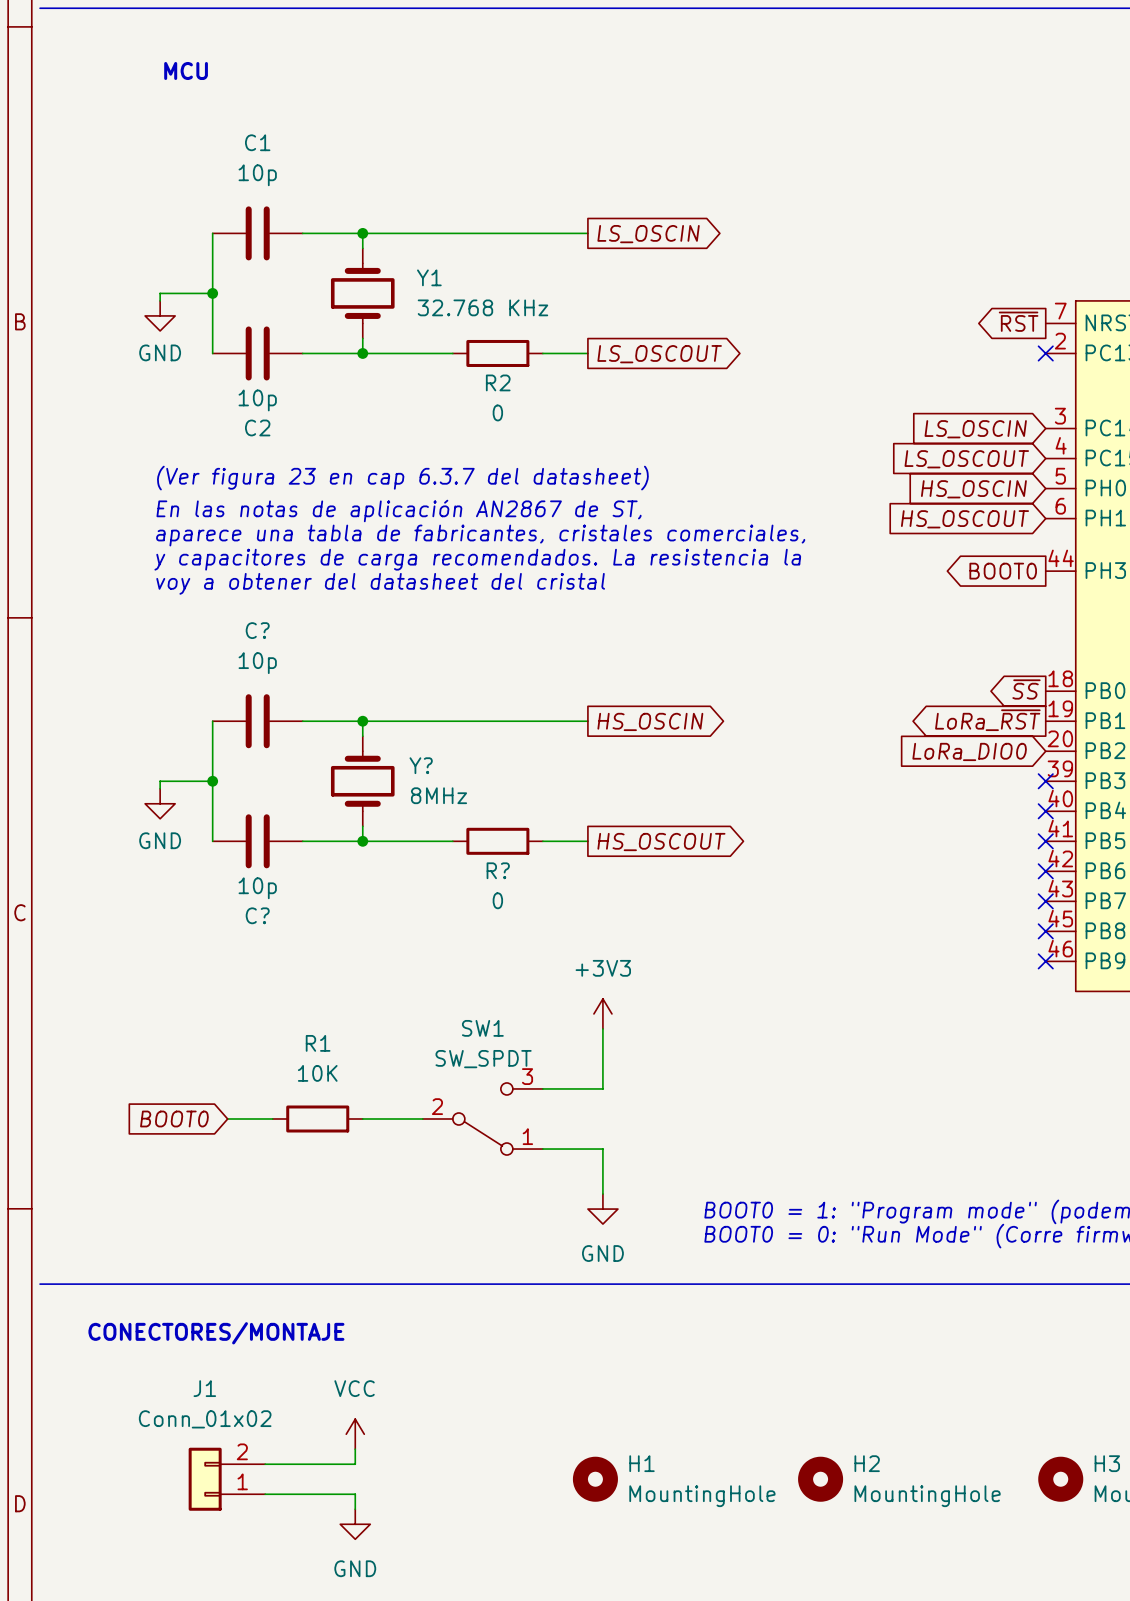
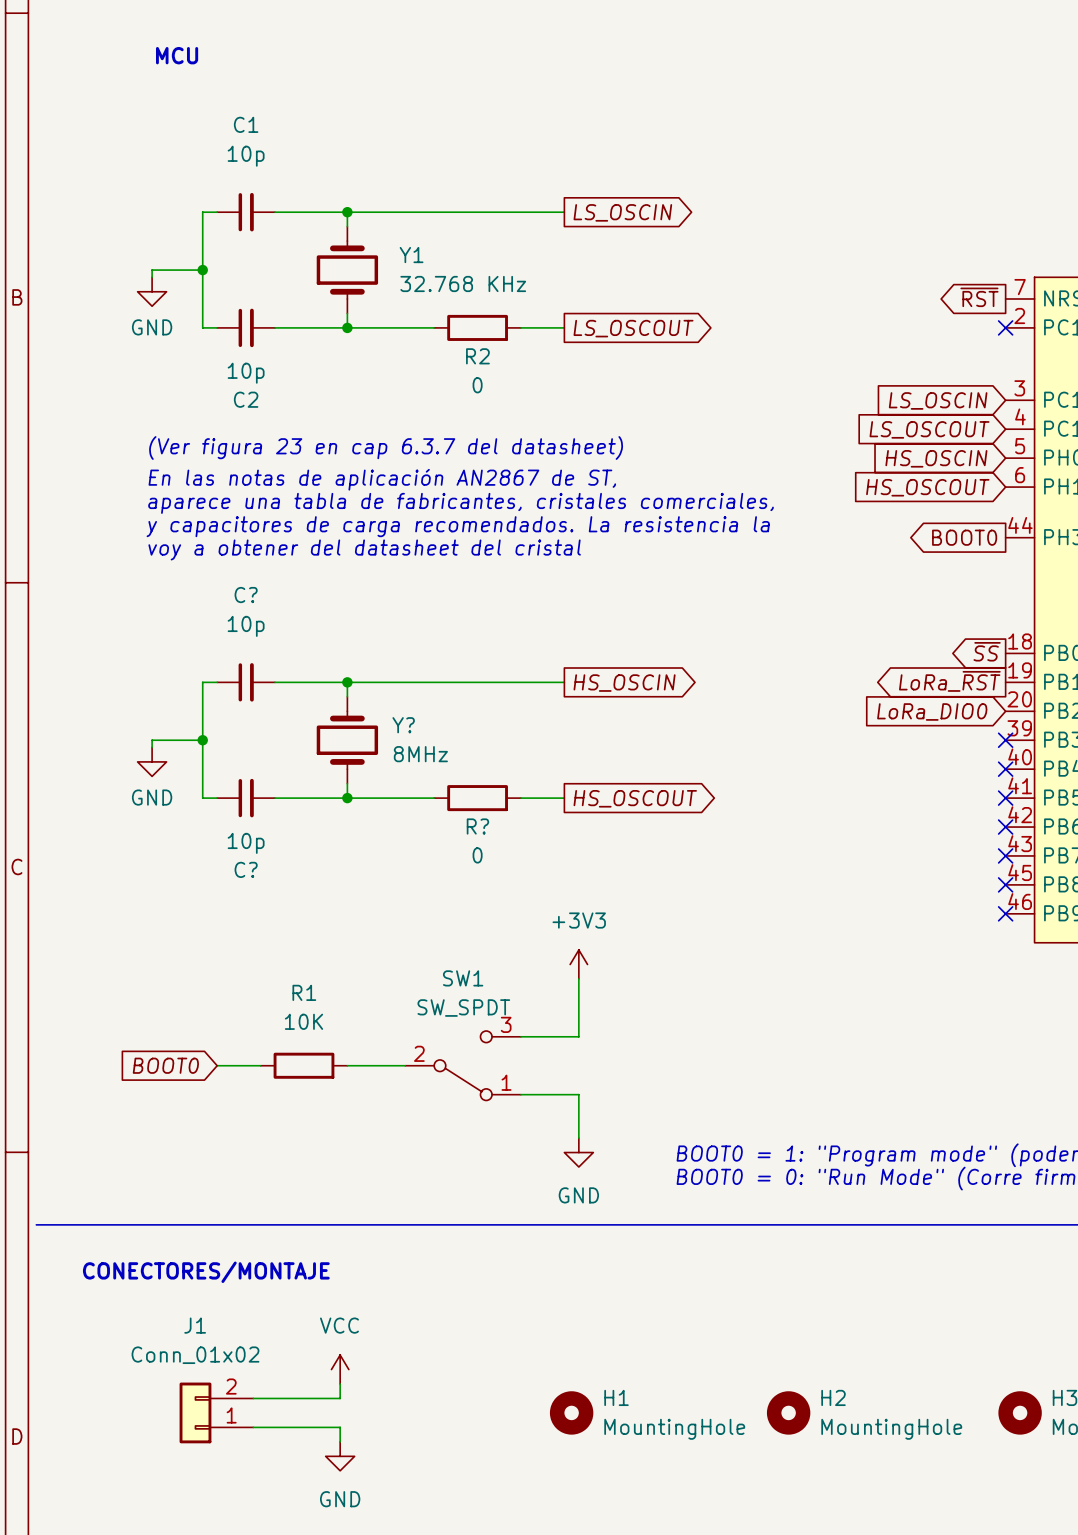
C1 symbol: [212, 206, 303, 261] -> [217, 192, 276, 232]
C2 symbol: [212, 326, 303, 381] -> [217, 308, 276, 348]
C? symbol: [212, 694, 303, 749] -> [217, 663, 276, 702]
C? symbol: [212, 814, 303, 869] -> [217, 778, 276, 818]

